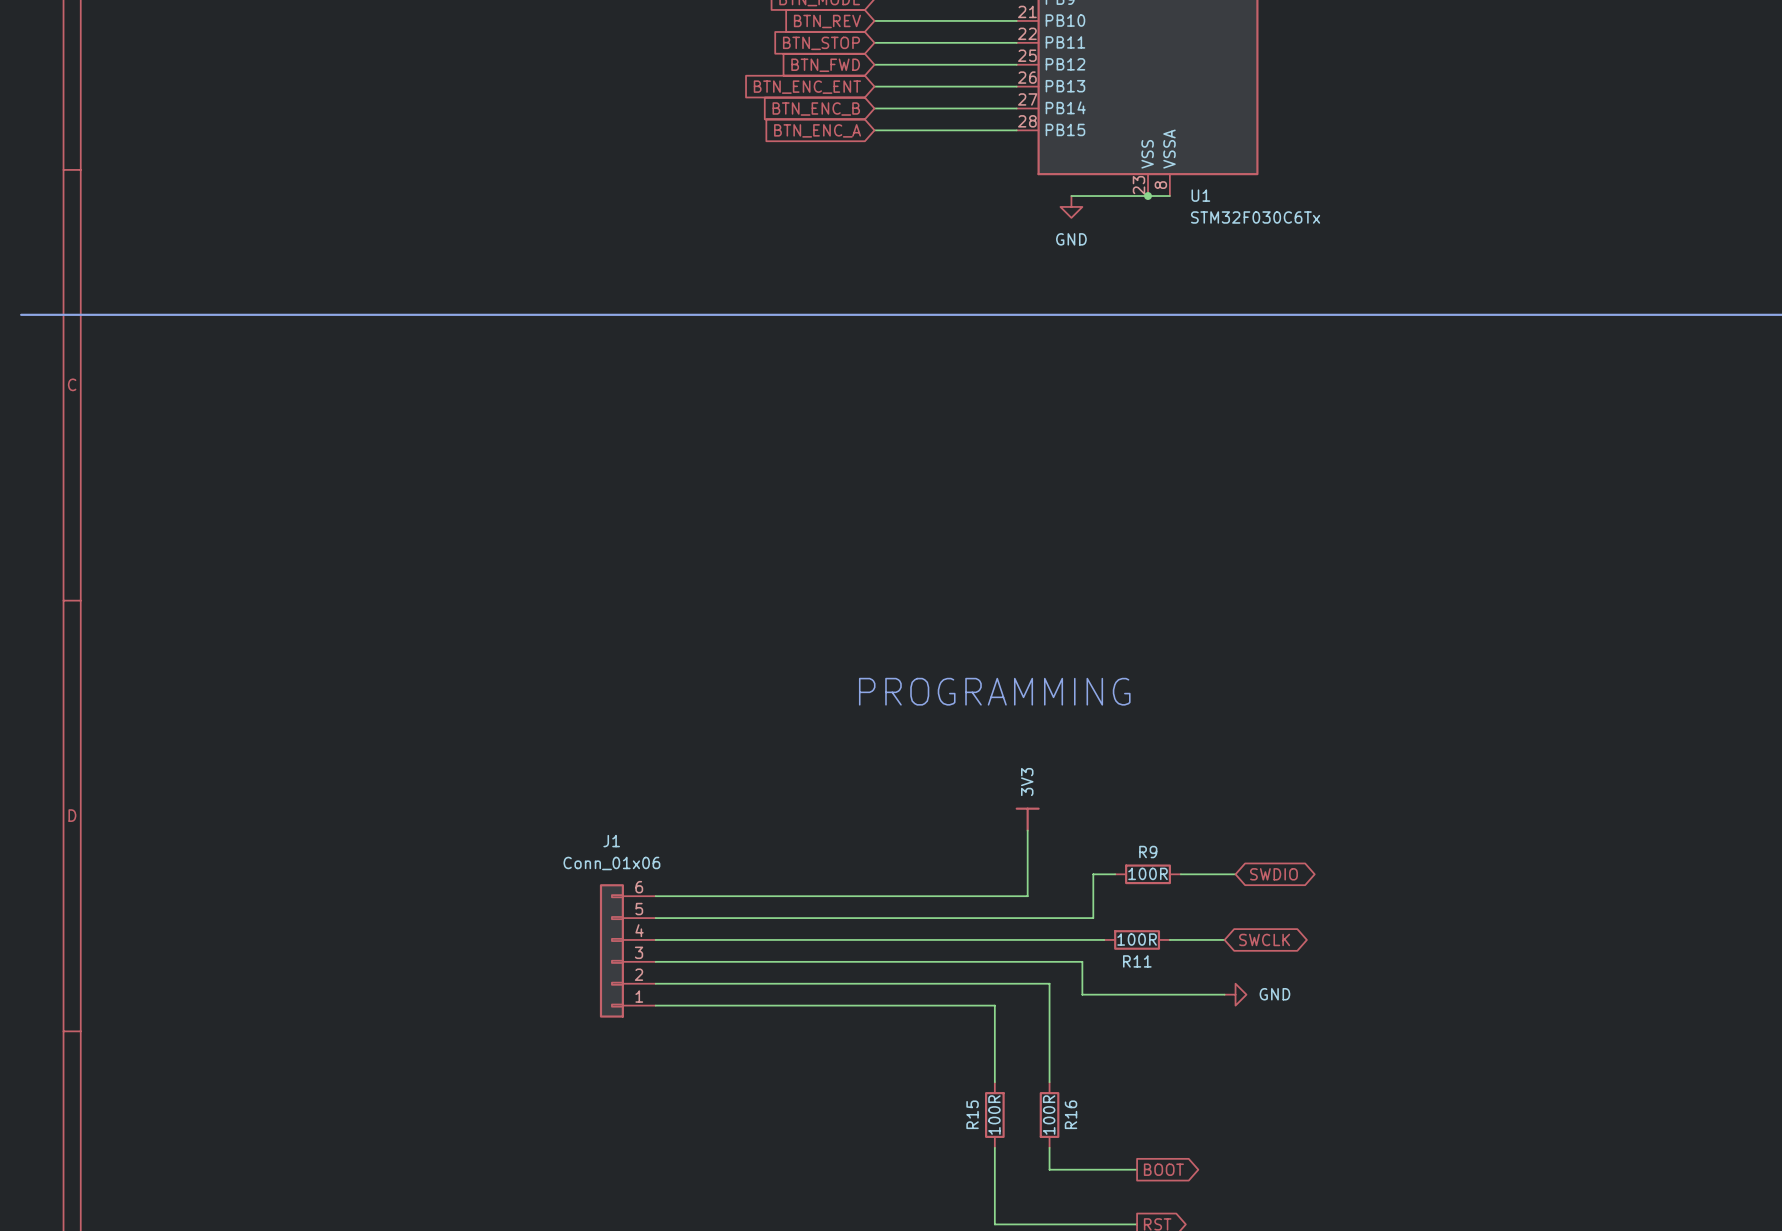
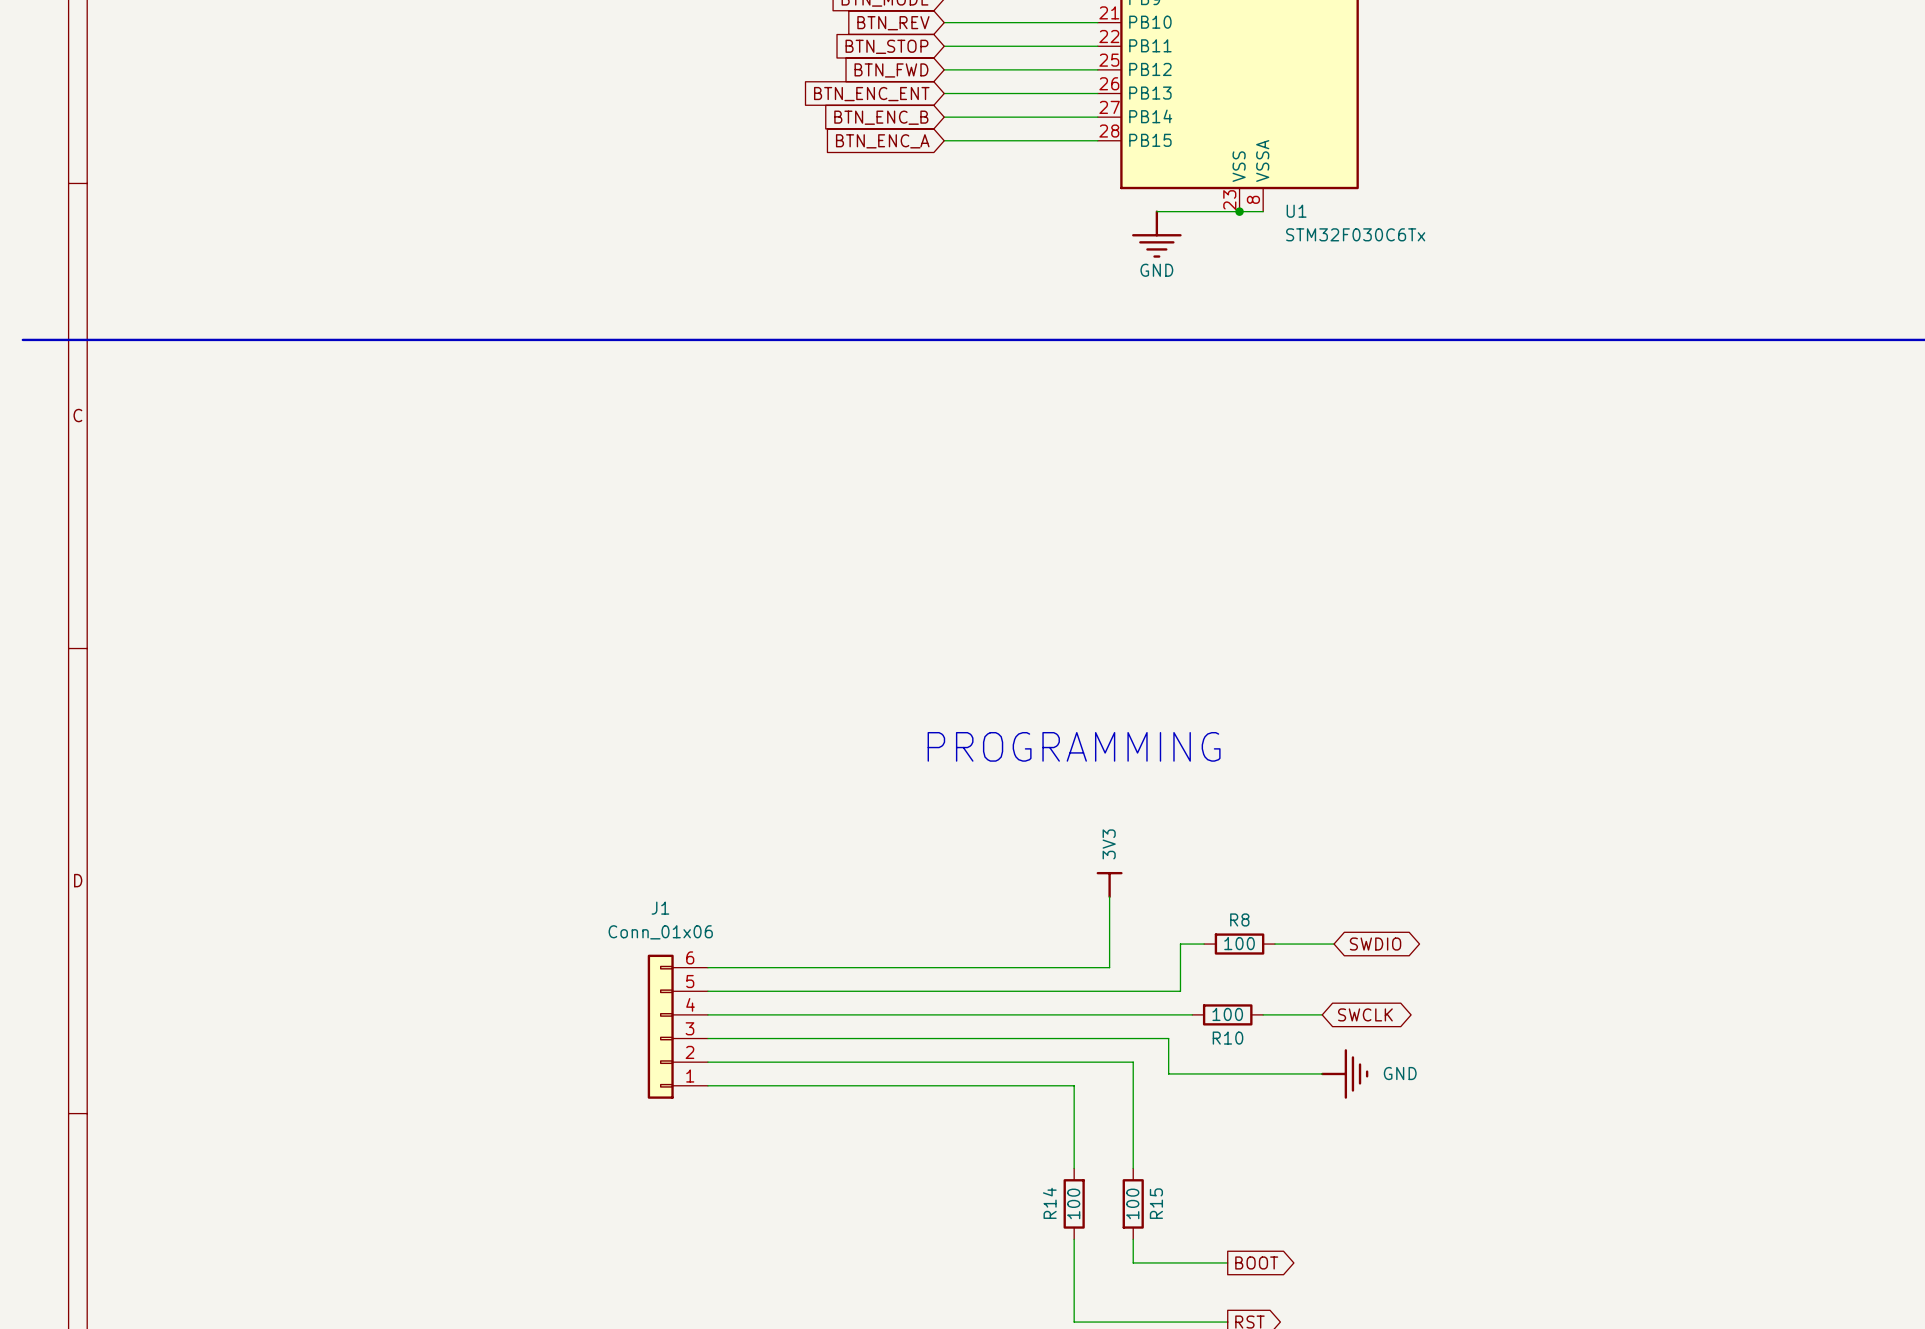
power symbol: GND (1071, 206) -> none
power symbol: none -> GND (1156, 234)
R9 name: R9 (1148, 852) -> R8 (1239, 919)
R9 value: 100R (1148, 873) -> 100 (1239, 943)
R11 value: 100R (1137, 939) -> 100 (1227, 1014)
R11 name: R11 (1137, 961) -> R10 (1228, 1038)
power symbol: GND (1235, 994) -> none
power symbol: none -> GND (1344, 1073)
R15 name: R15 (972, 1114) -> R14 (1049, 1203)
R16 name: R16 (1071, 1114) -> R15 (1156, 1203)
R15 value: 100R (994, 1115) -> 100 (1073, 1203)
R16 value: 100R (1049, 1115) -> 100 (1132, 1203)

